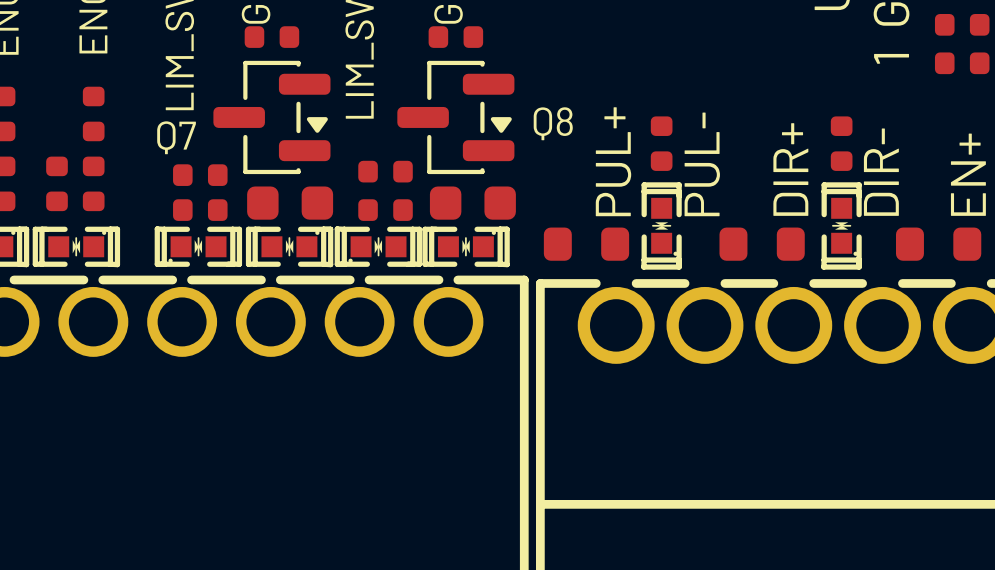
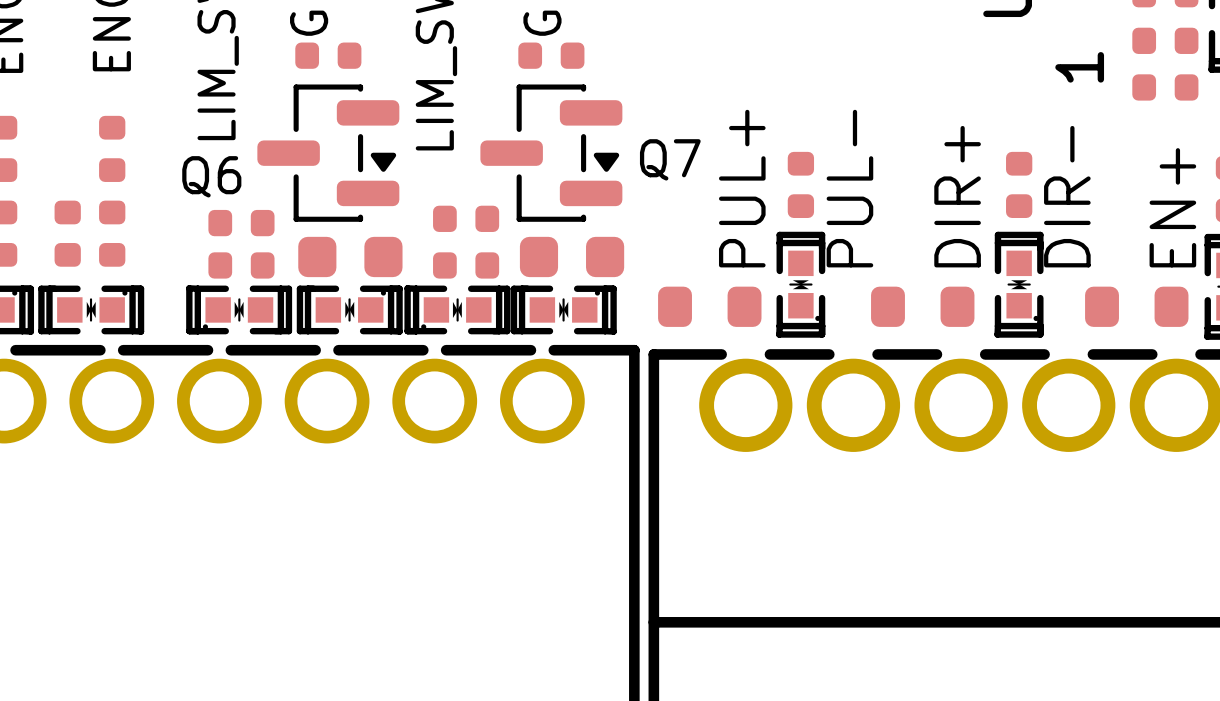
Q8 name: Q8 (553, 123) -> Q7 (670, 159)
Q7 name: Q7 (176, 137) -> Q6 (211, 176)

